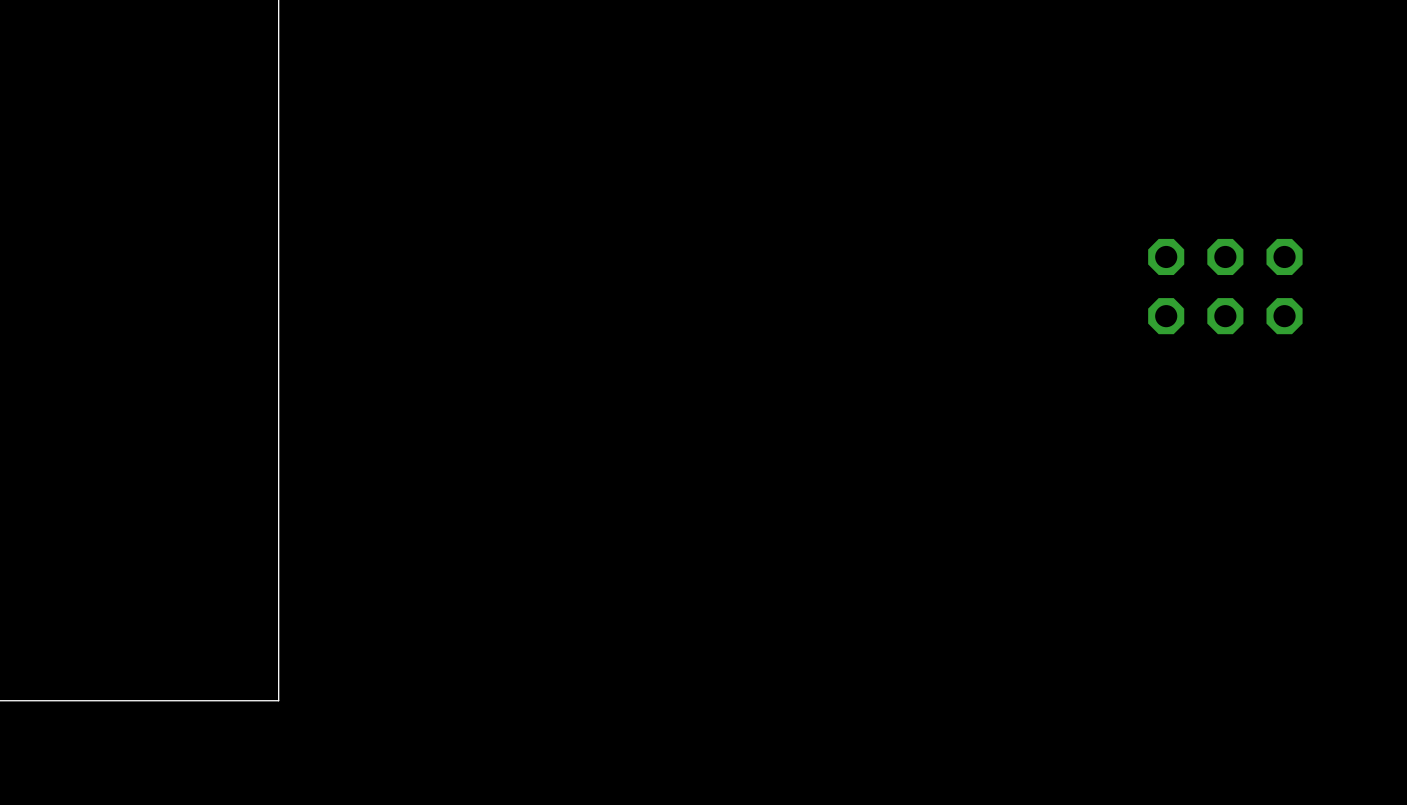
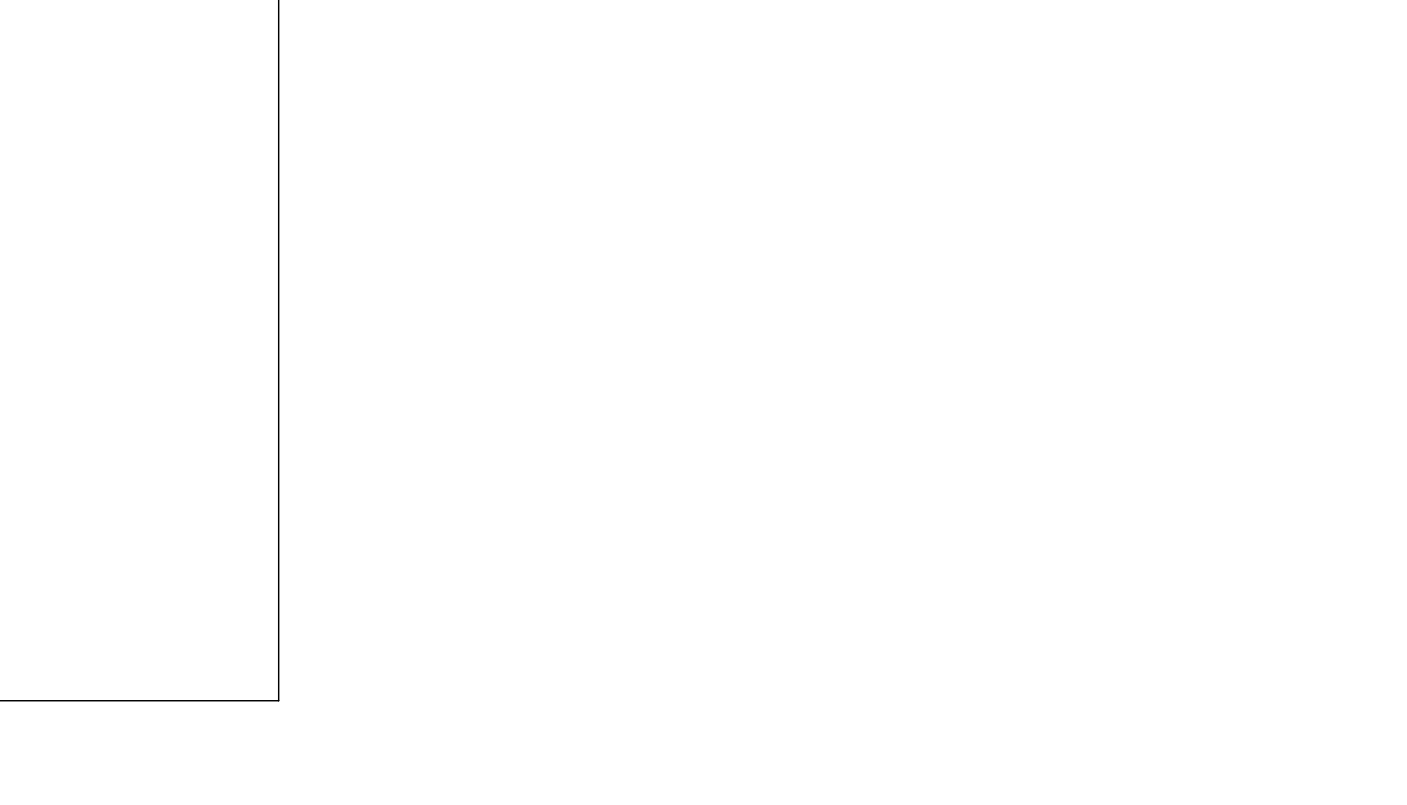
part: (1225, 286) -> none

